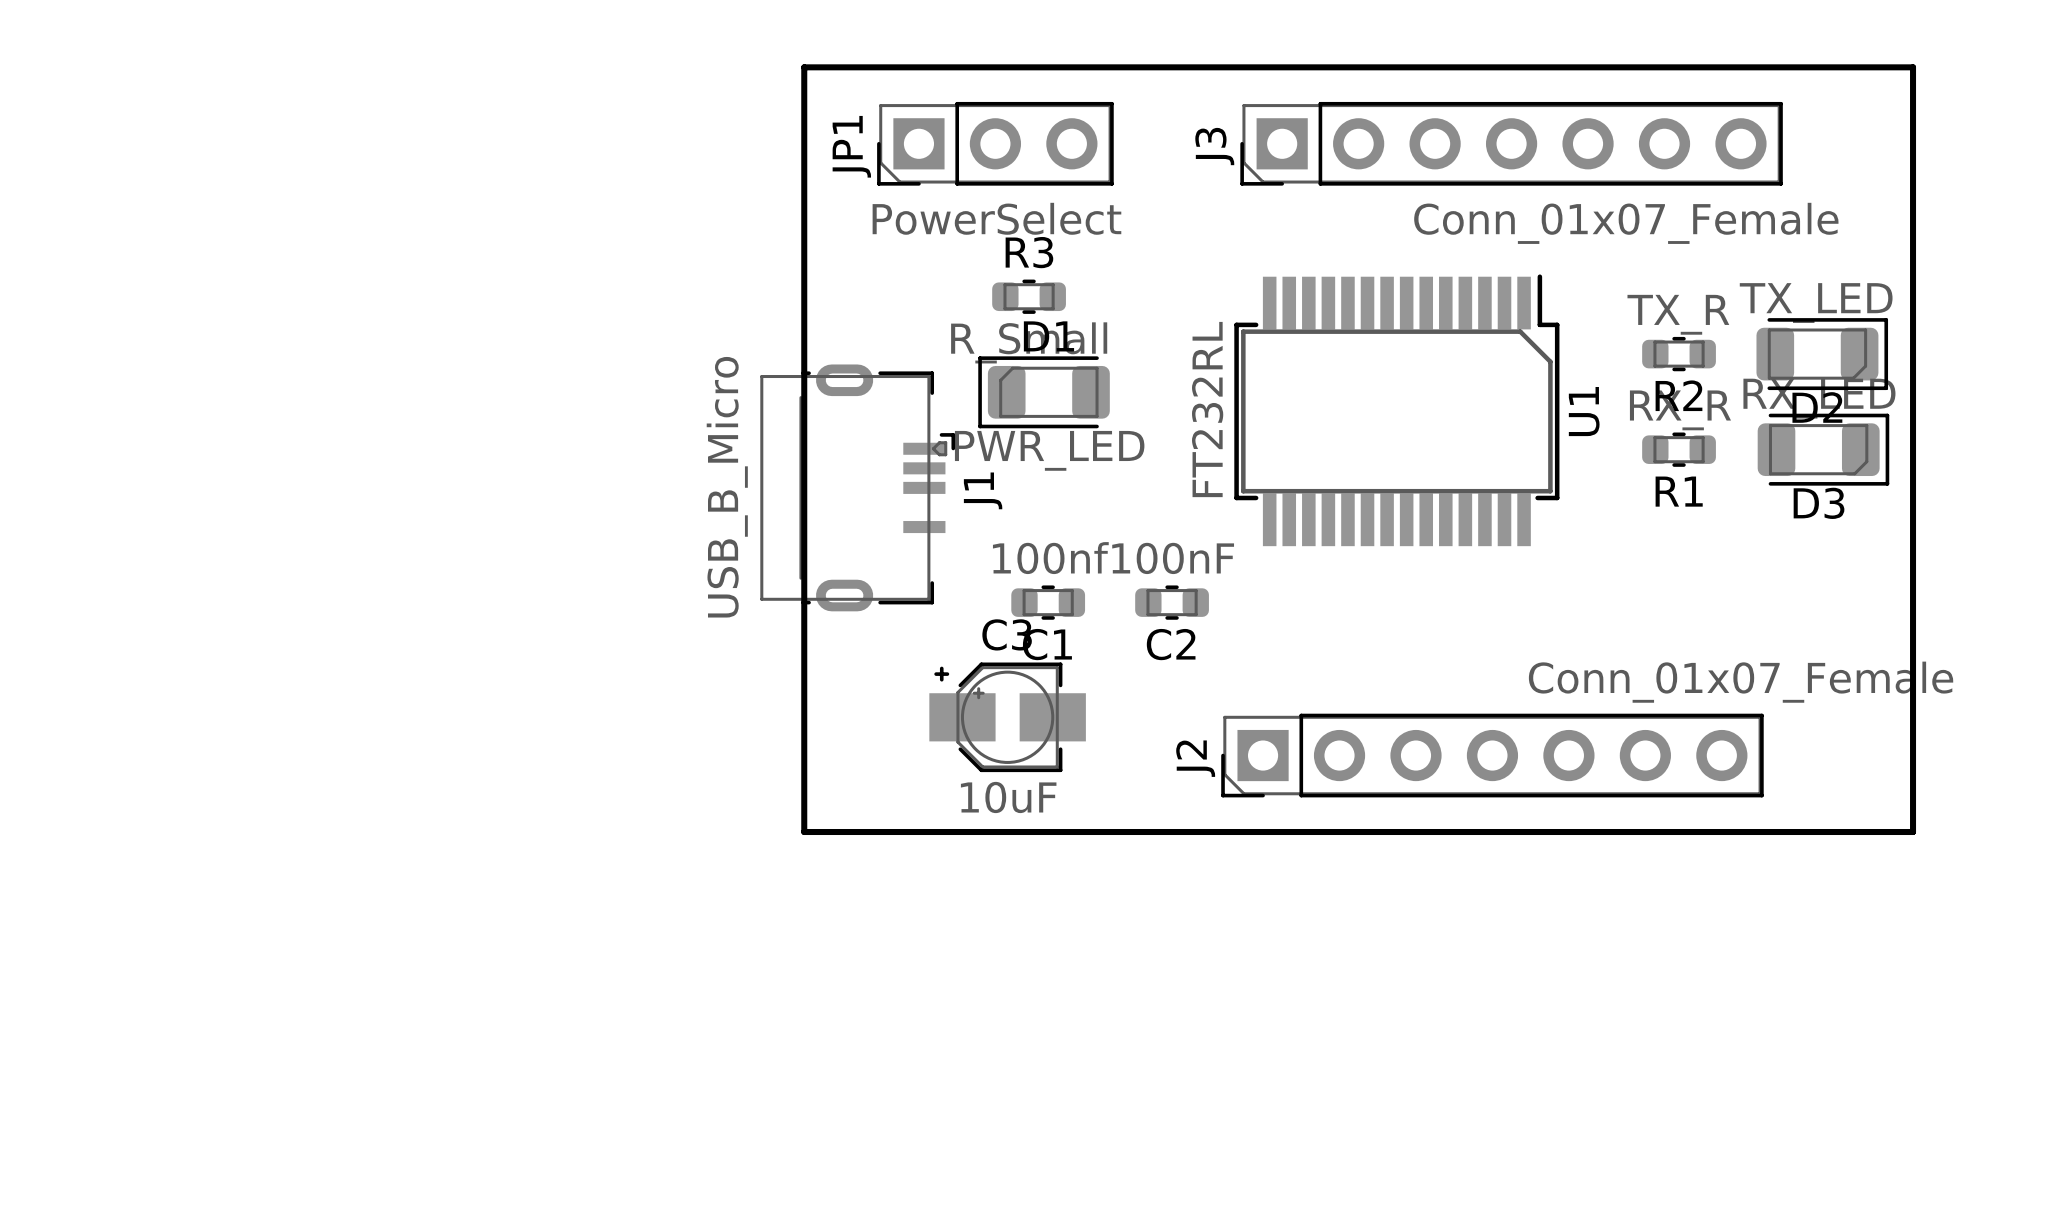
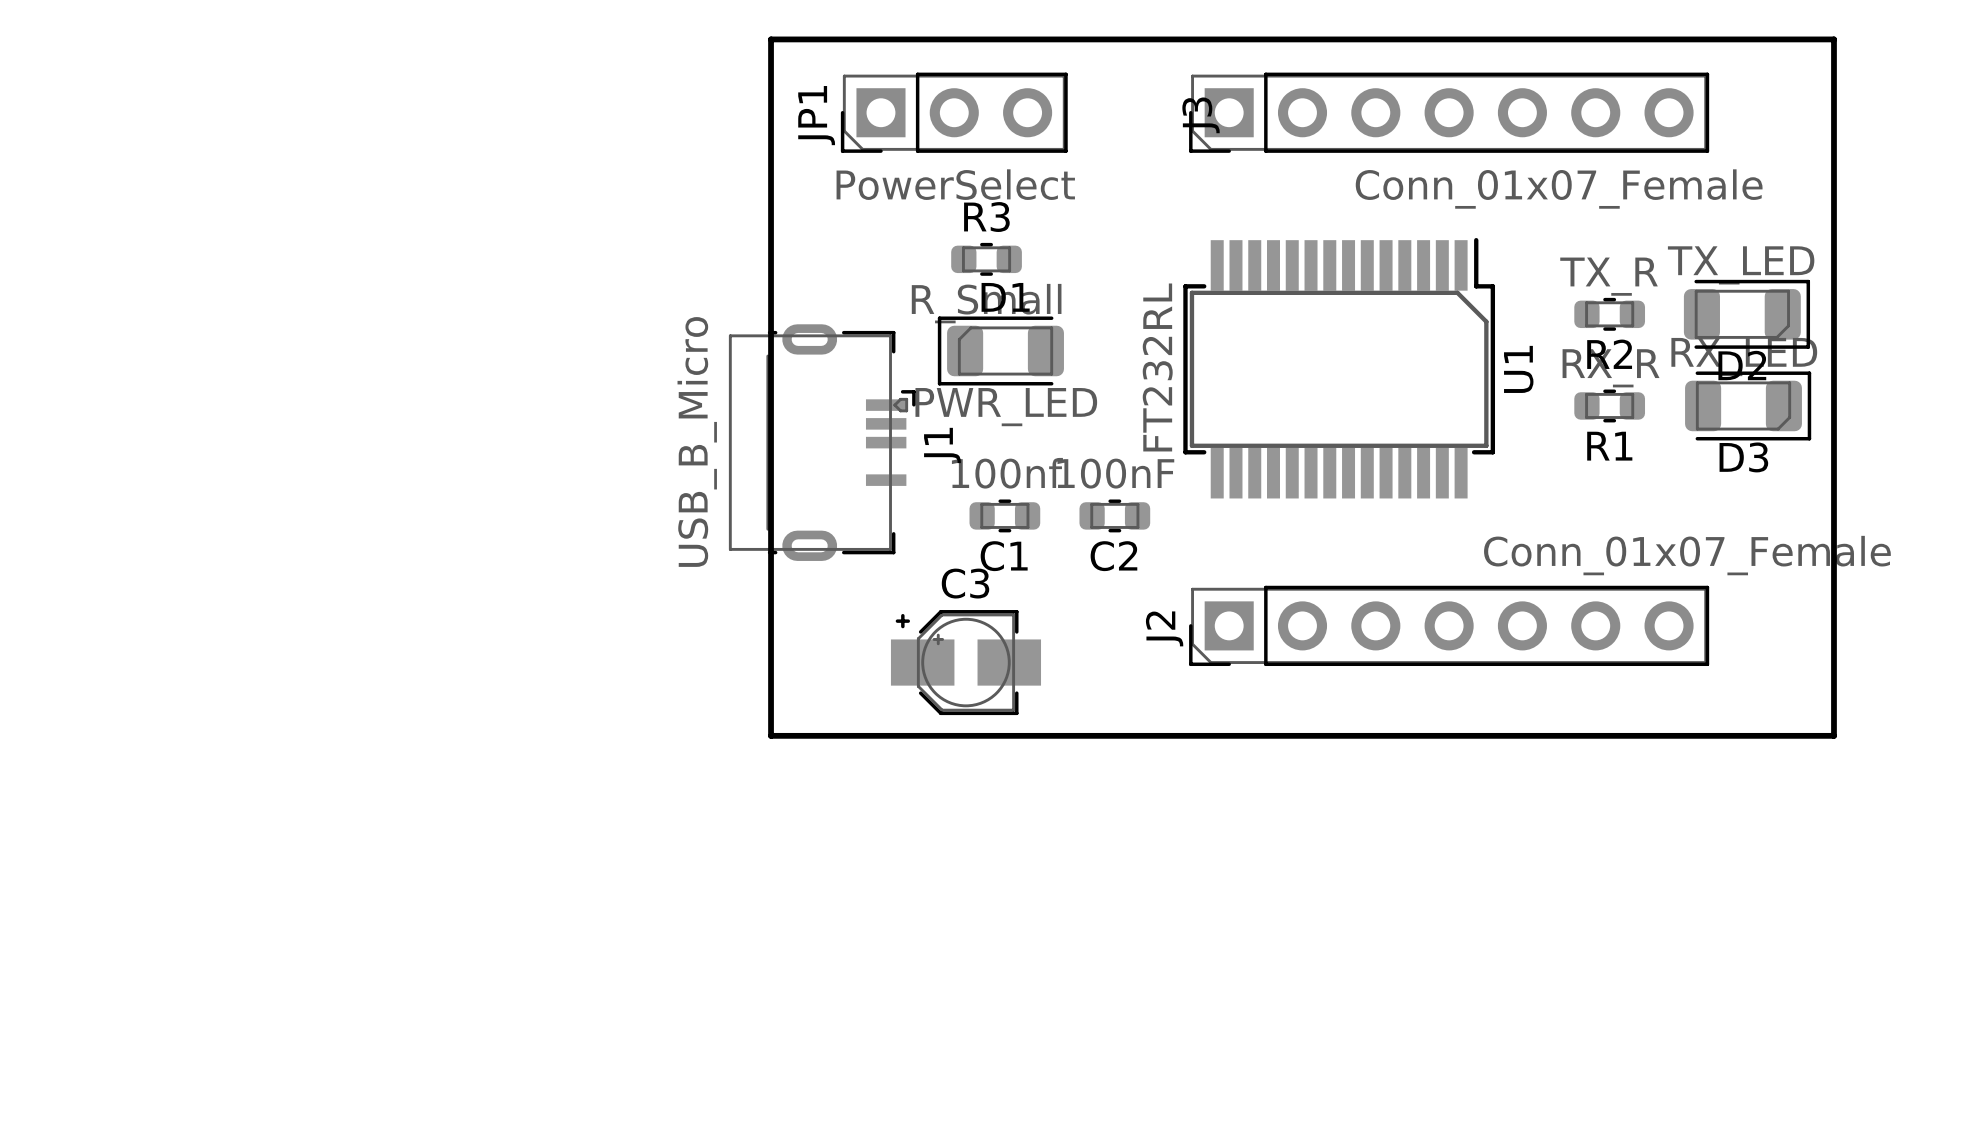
J3 name position: J3 (1214, 146) -> J3 (1201, 115)
C1 position: (1048, 602) -> (1004, 515)
C2 position: (1172, 602) -> (1114, 515)
J2 position: (1492, 755) -> (1449, 625)
board edge: (804, 793) (804, 832) (1913, 832) (1913, 793) -> (771, 735) (1833, 735)
C3 value: 10uF (1008, 797) -> none

